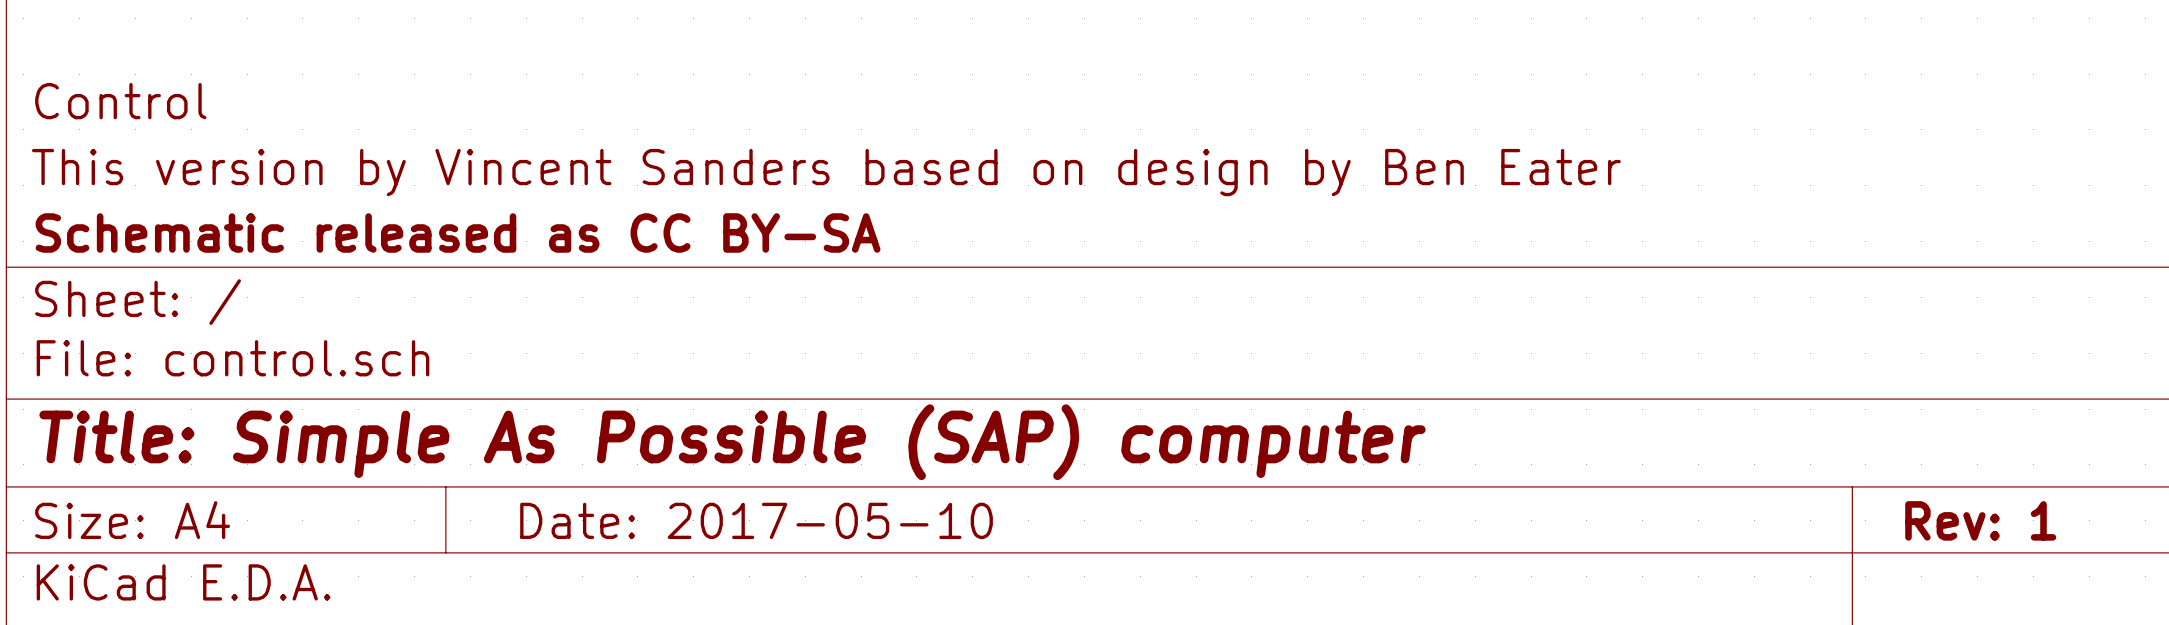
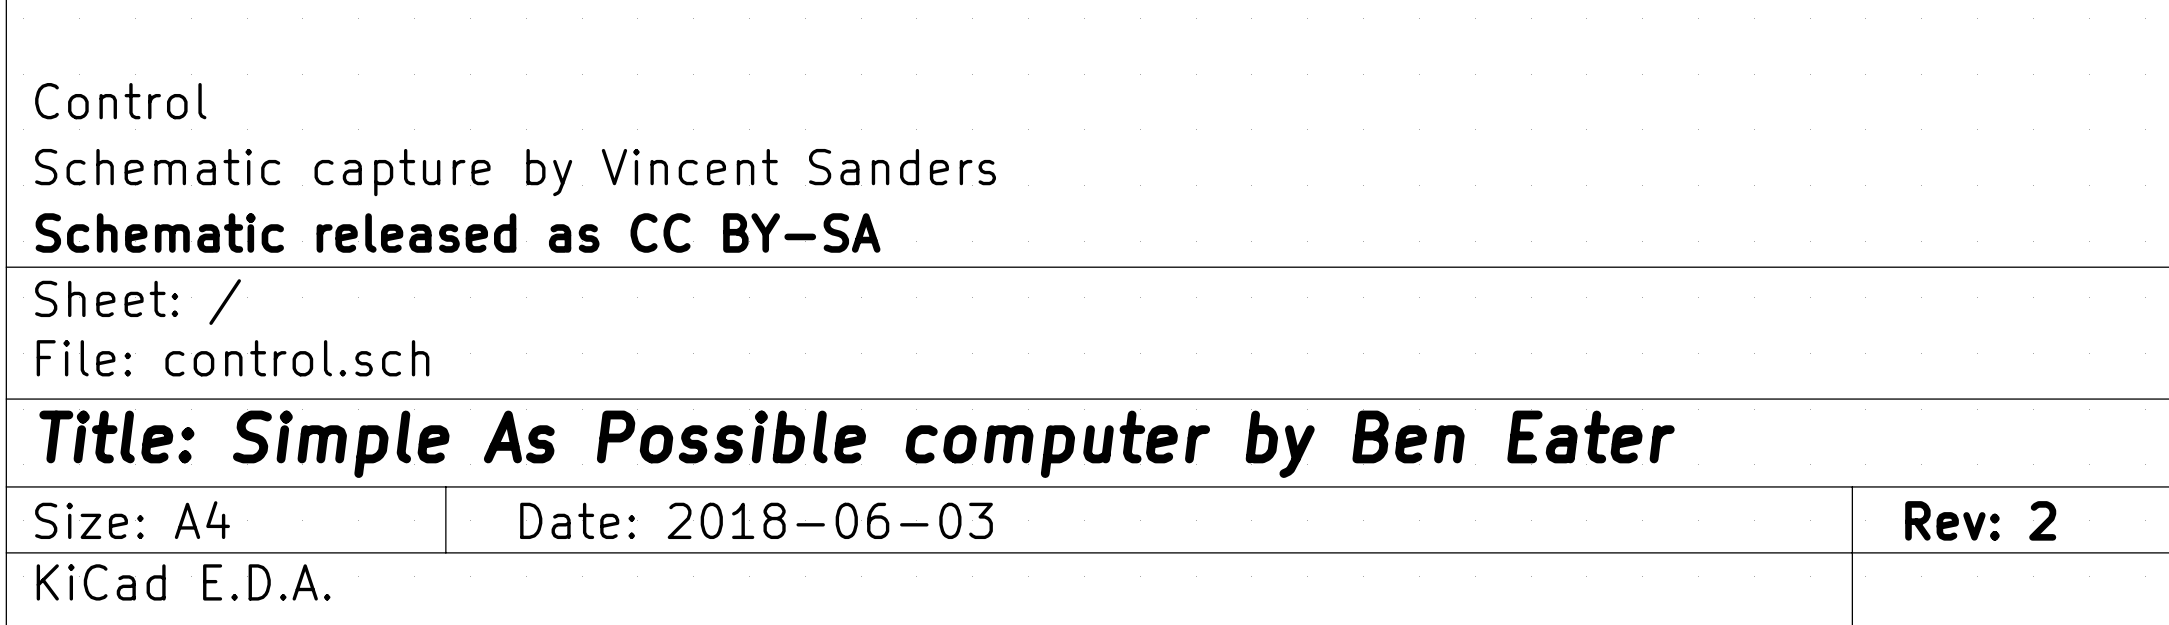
title block: This version by Vincent Sanders based on design by Ben Eater (826, 172) -> Schematic capture by Vincent Sanders (515, 172)
title block: Title: Simple As Possible (SAP) computer (732, 442) -> Title: Simple As Possible computer by Ben Eater (857, 444)
title block: Date: 2017-05-10 (756, 520) -> Date: 2018-06-03 (756, 520)
title block: Rev: 1 (1980, 520) -> Rev: 2 (1980, 520)

